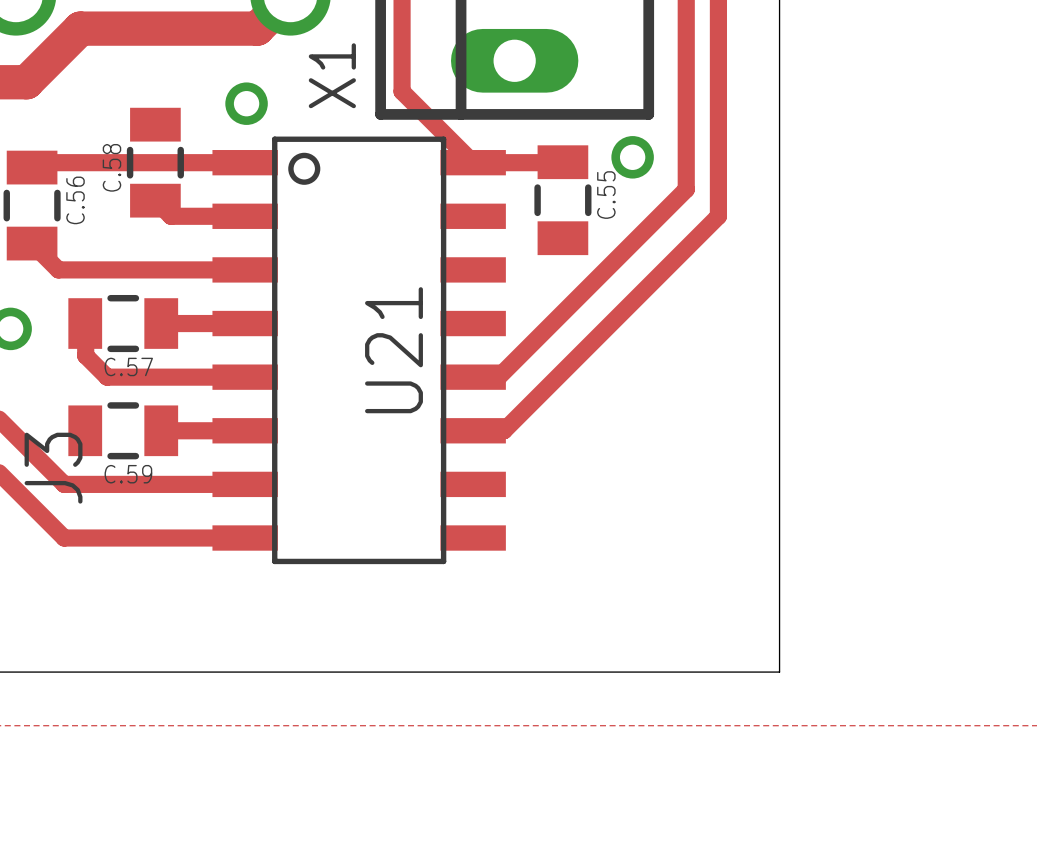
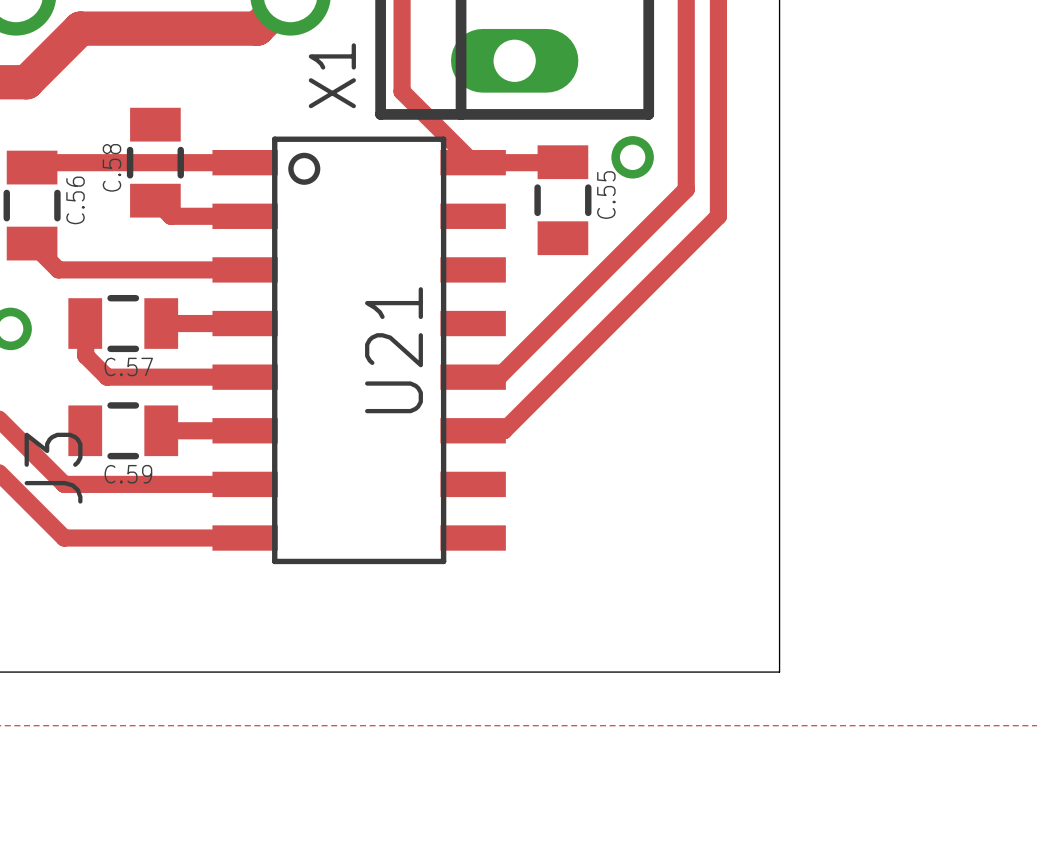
via: (246, 103) -> none

